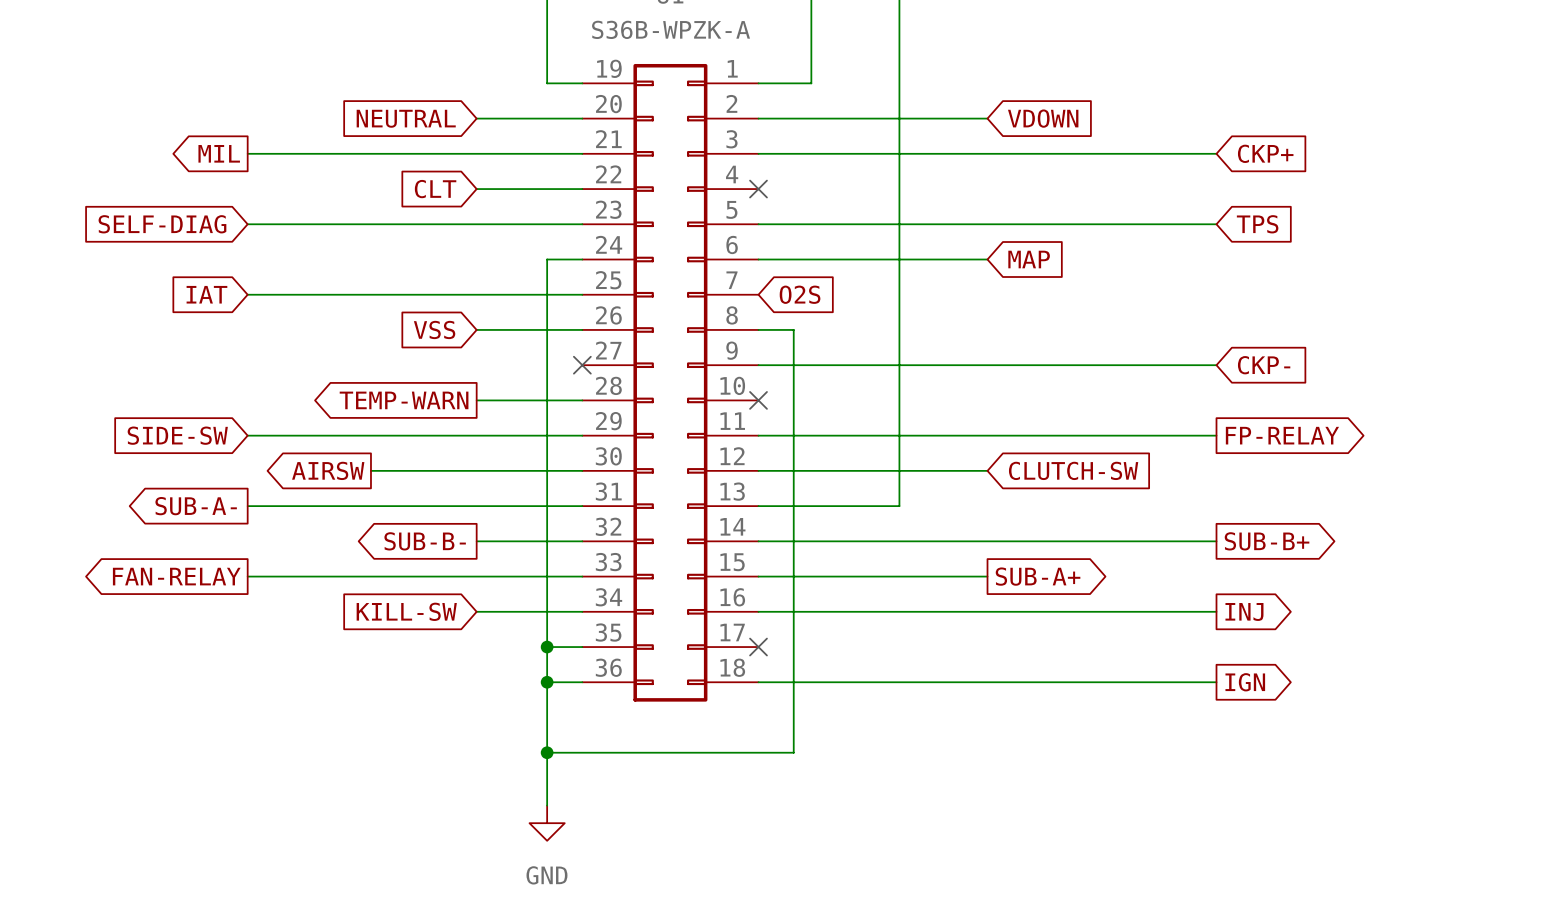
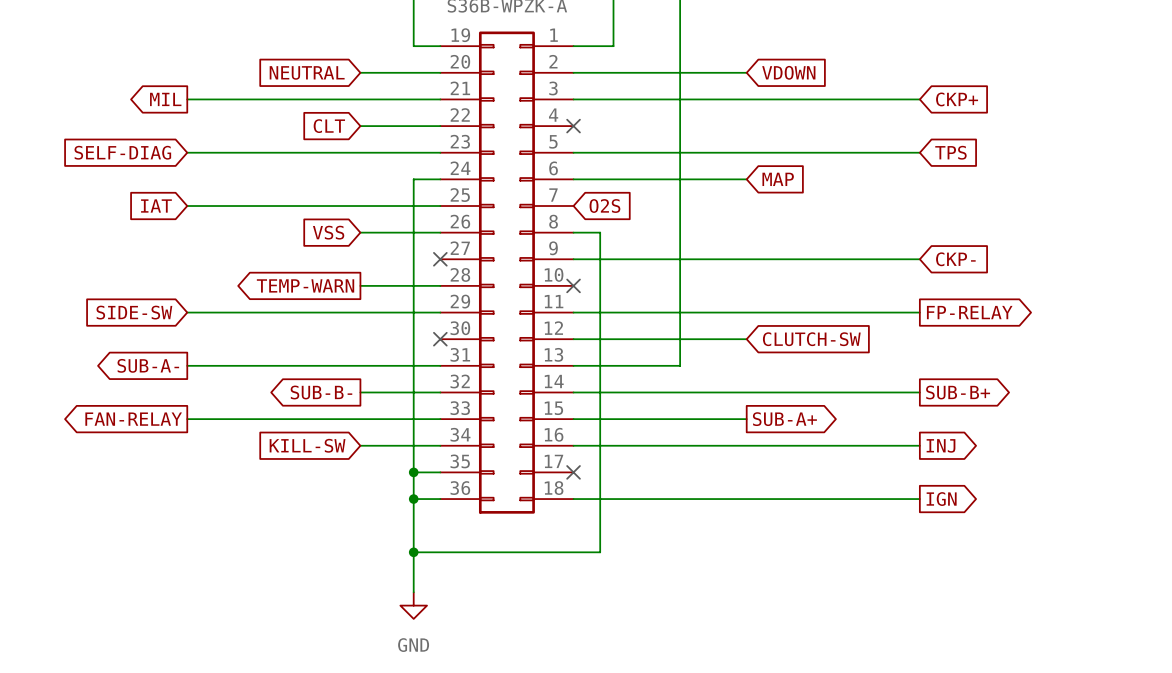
global label: AIRSW (328, 470) -> none
wire: (370, 470) (582, 470) -> none
no-connect mark: none -> (440, 339)

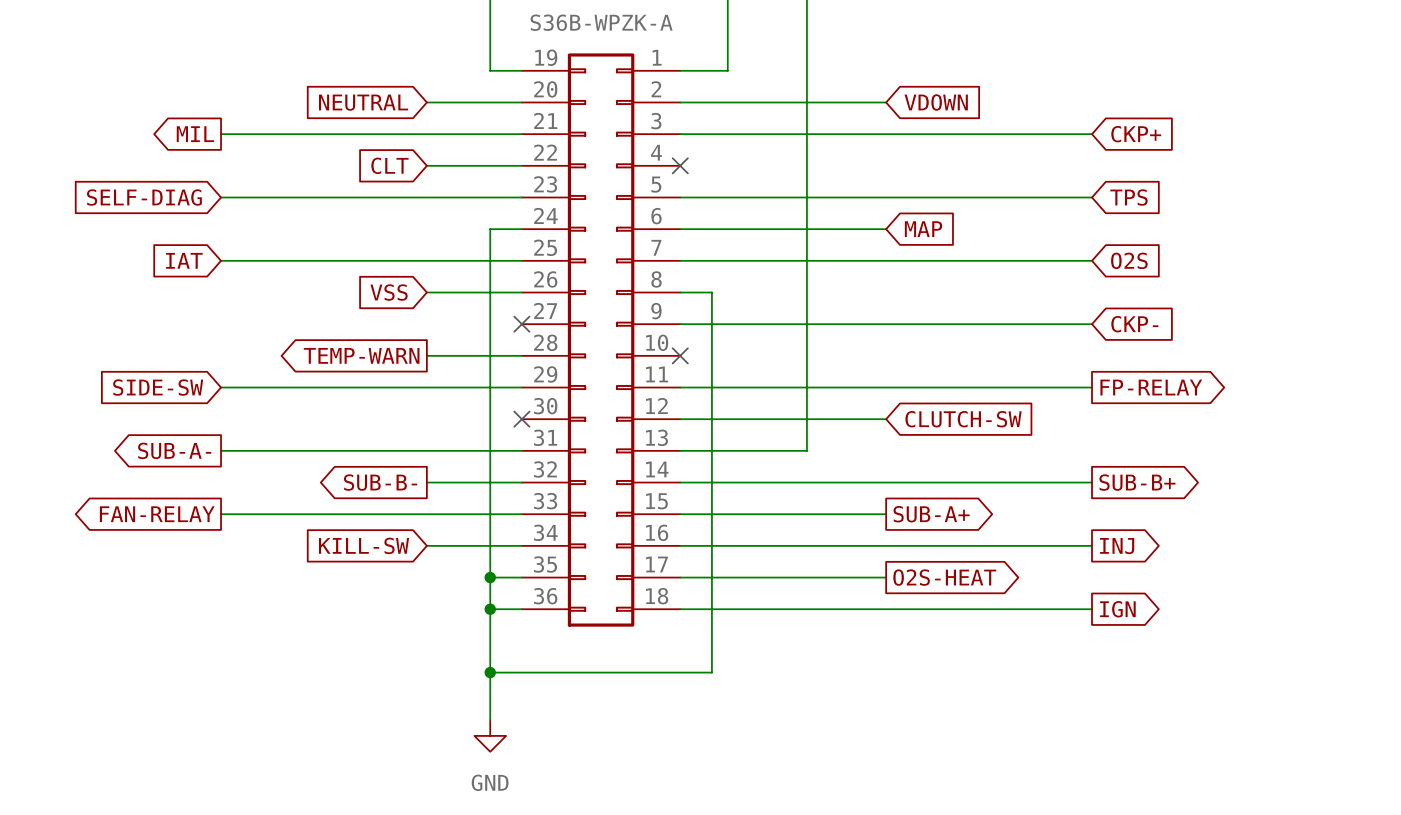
wire: none -> (680, 260) (1092, 260)
global label: O2S (604, 206) -> none
global label: none -> O2S (1129, 260)
wire: none -> (680, 577) (886, 577)
no-connect mark: (573, 472) -> none
global label: none -> O2S-HEAT (944, 577)

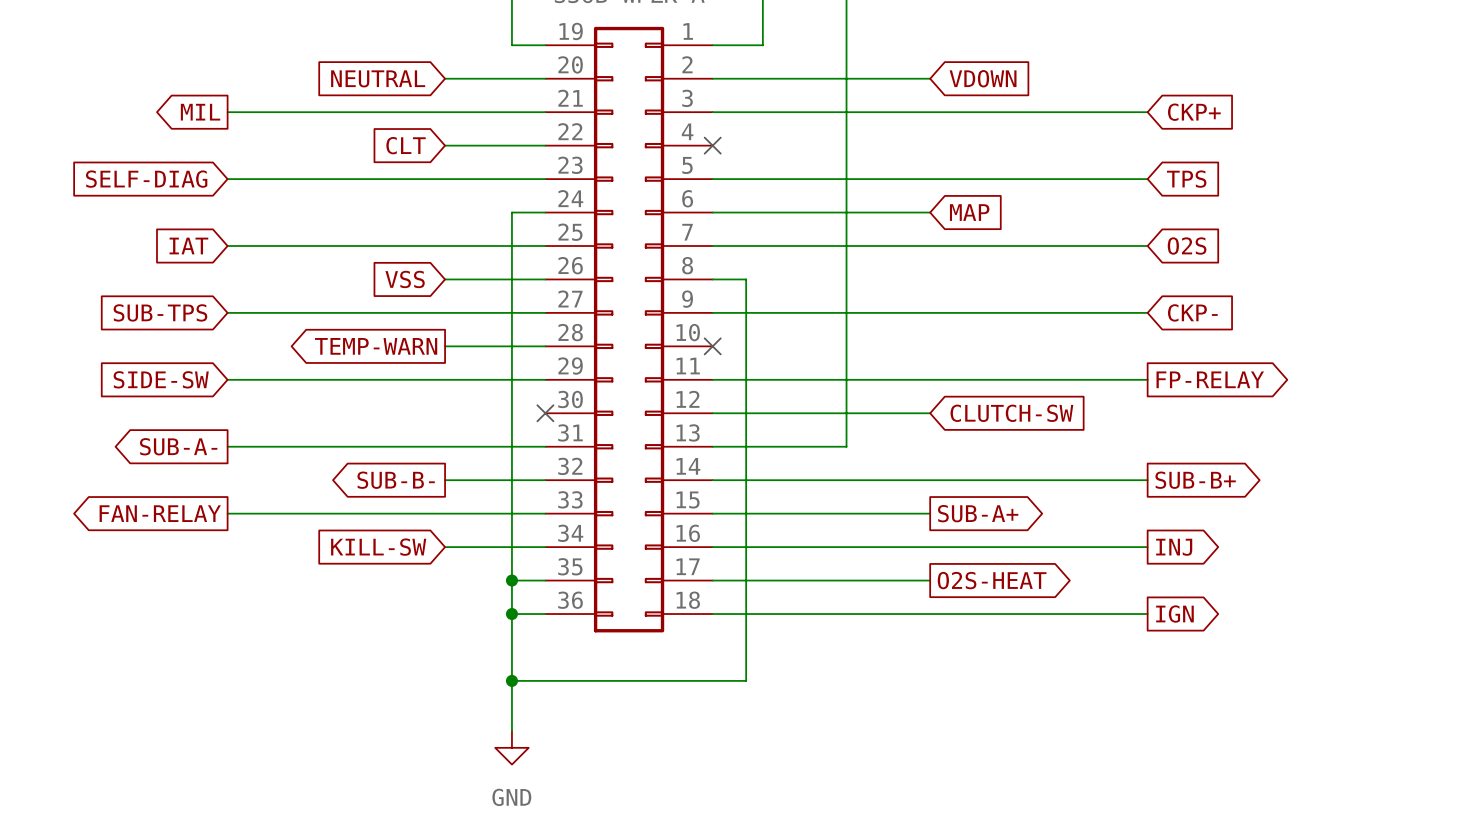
global label: none -> SUB-TPS (160, 312)
wire: none -> (227, 312) (545, 312)
no-connect mark: (521, 324) -> none

